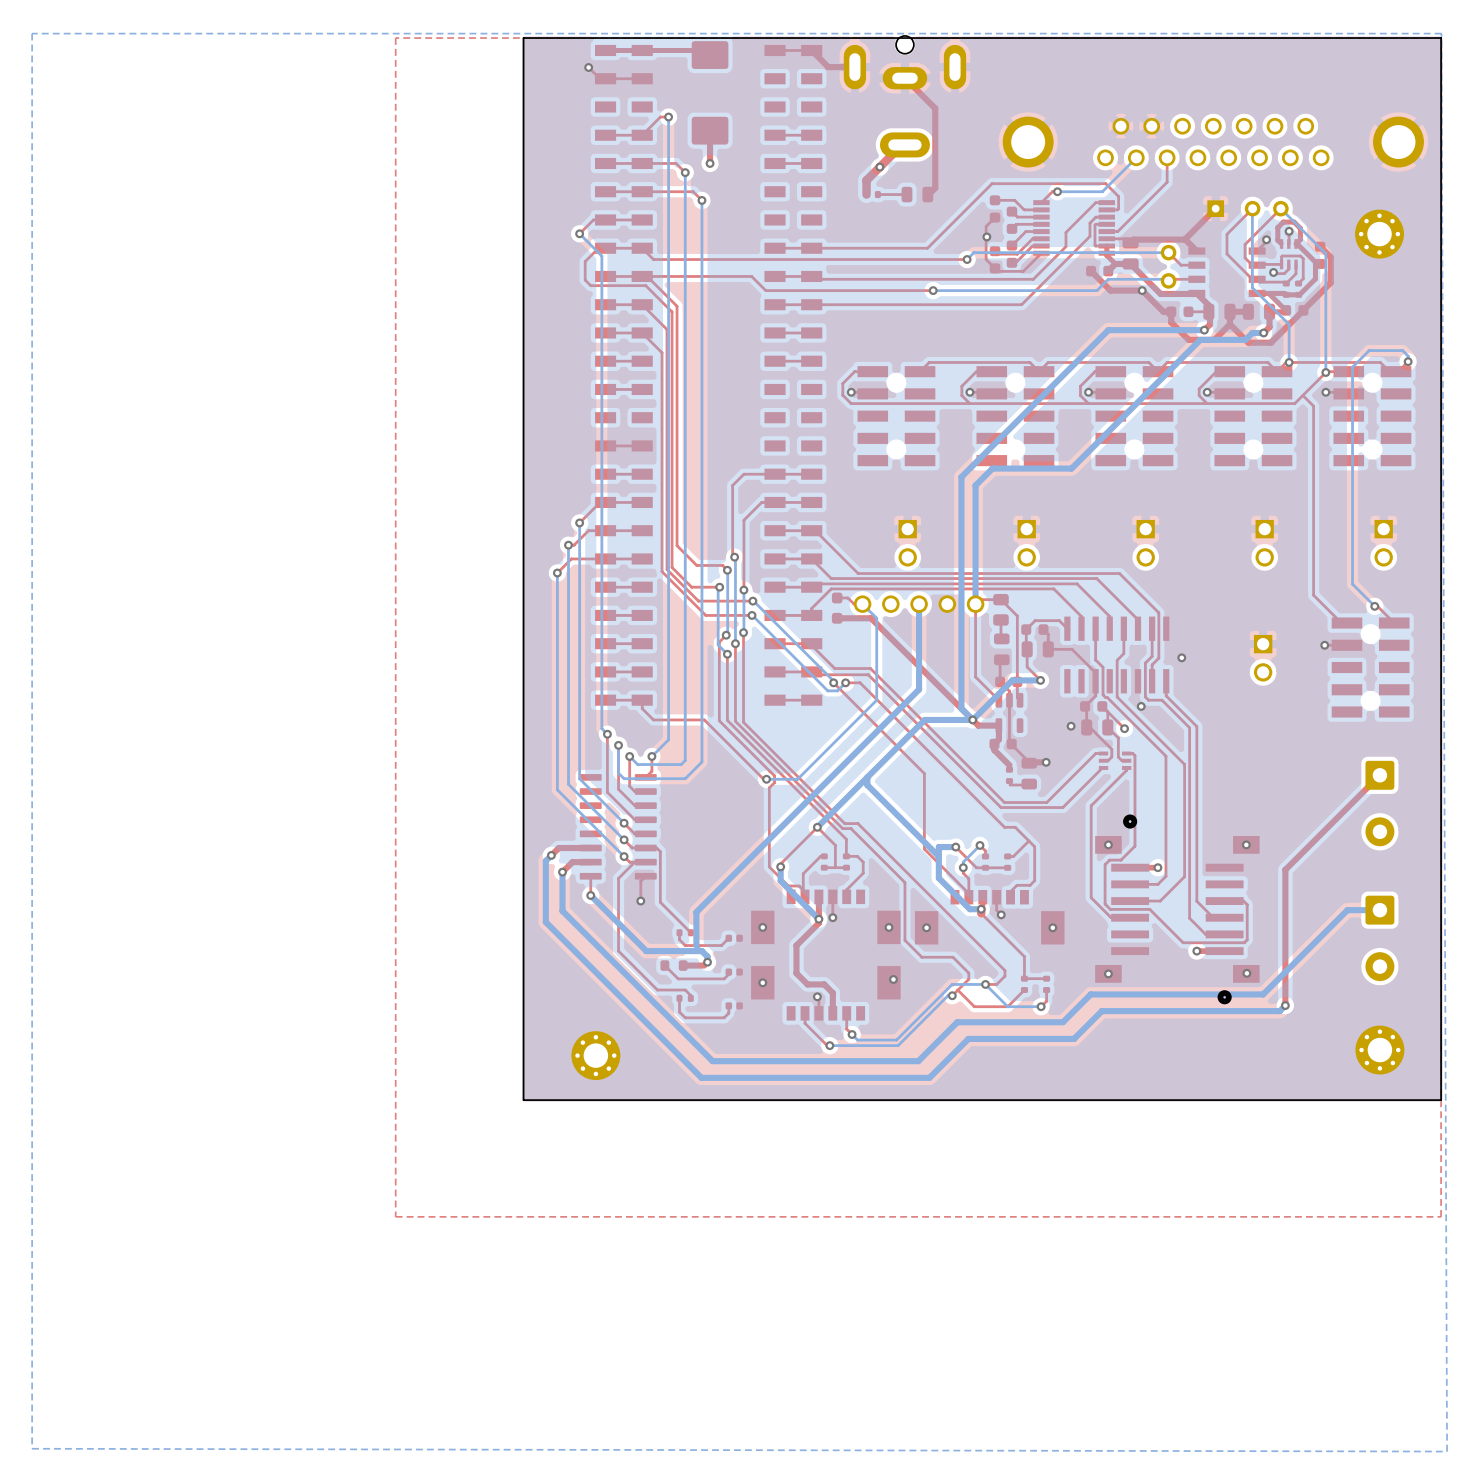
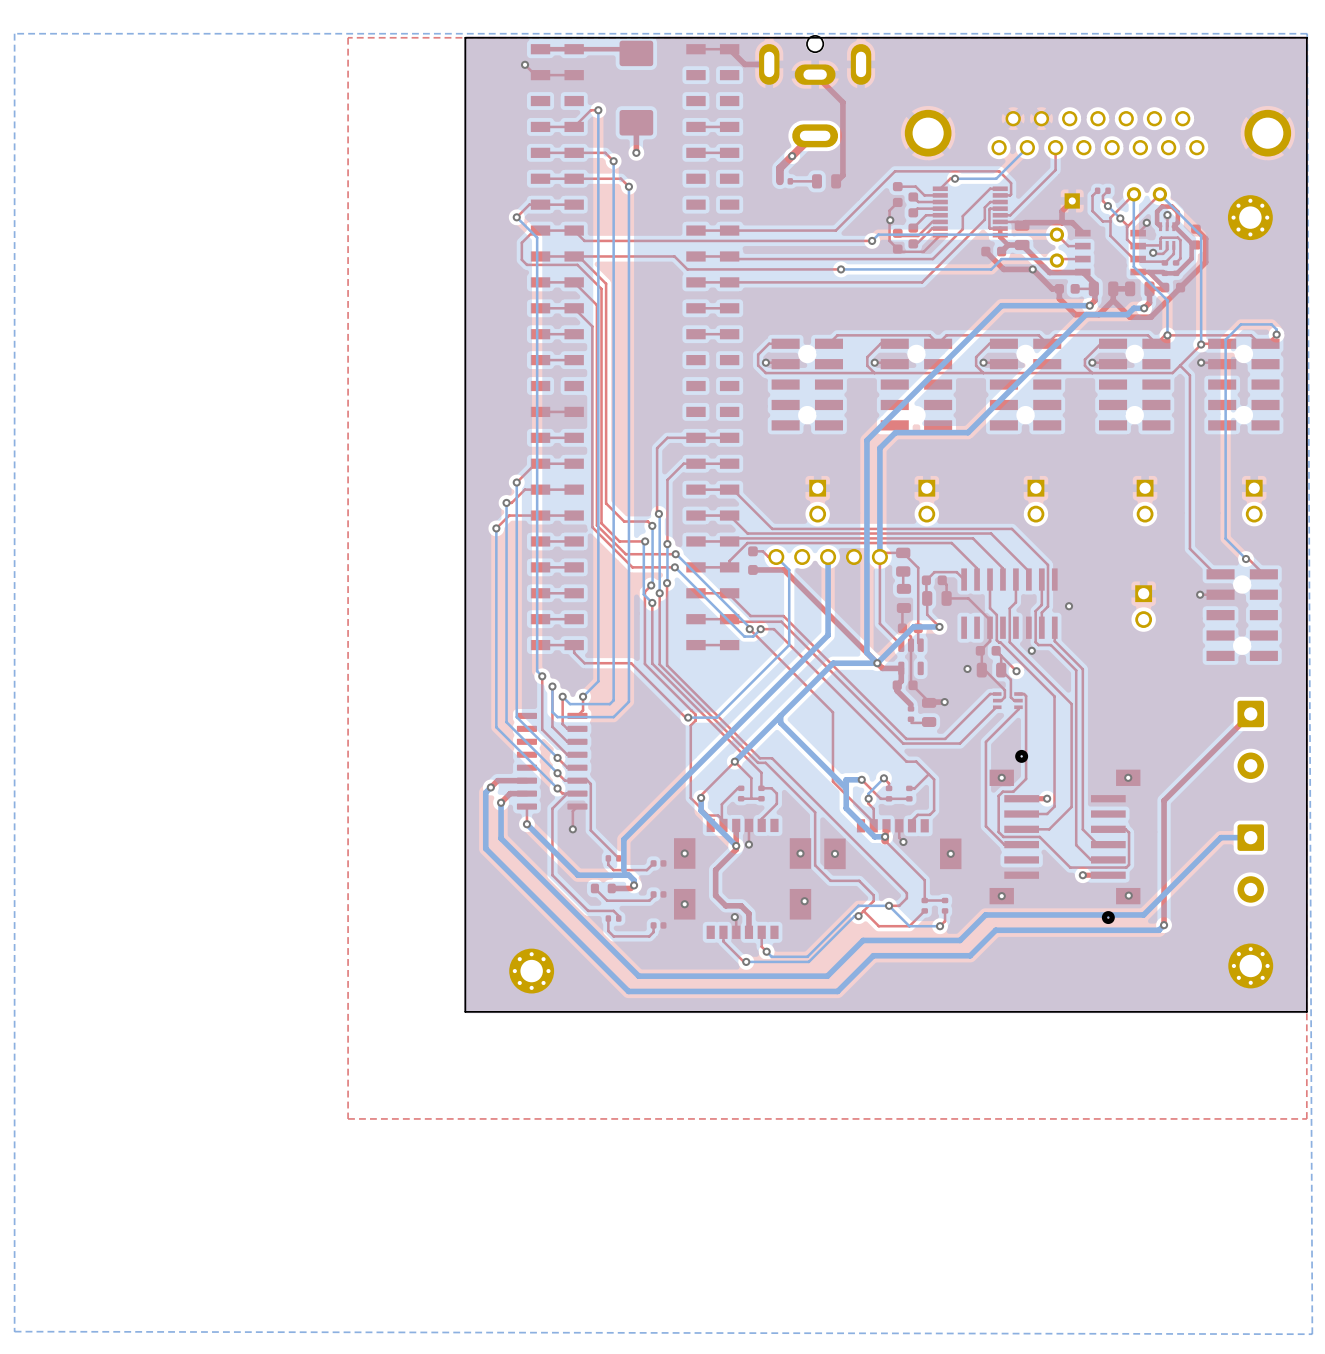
part footprint: [1207, 200, 1225, 218] -> [1094, 187, 1111, 195]
top track: none -> (1097, 190) (1092, 195) (1092, 211) (1102, 221) (1110, 221)
top track: none -> (1108, 190) (1102, 195) (1102, 201) (1107, 206)
top track: (1215, 208) (1185, 239) -> none
top track: none -> (1072, 200) (1062, 211) (1062, 222)
part: none -> (1072, 200)
bottom track: none -> (1107, 206) (1120, 218)
via: none -> (1107, 206)
top track: none -> (1120, 218) (1127, 227)
via: none -> (1120, 218)

